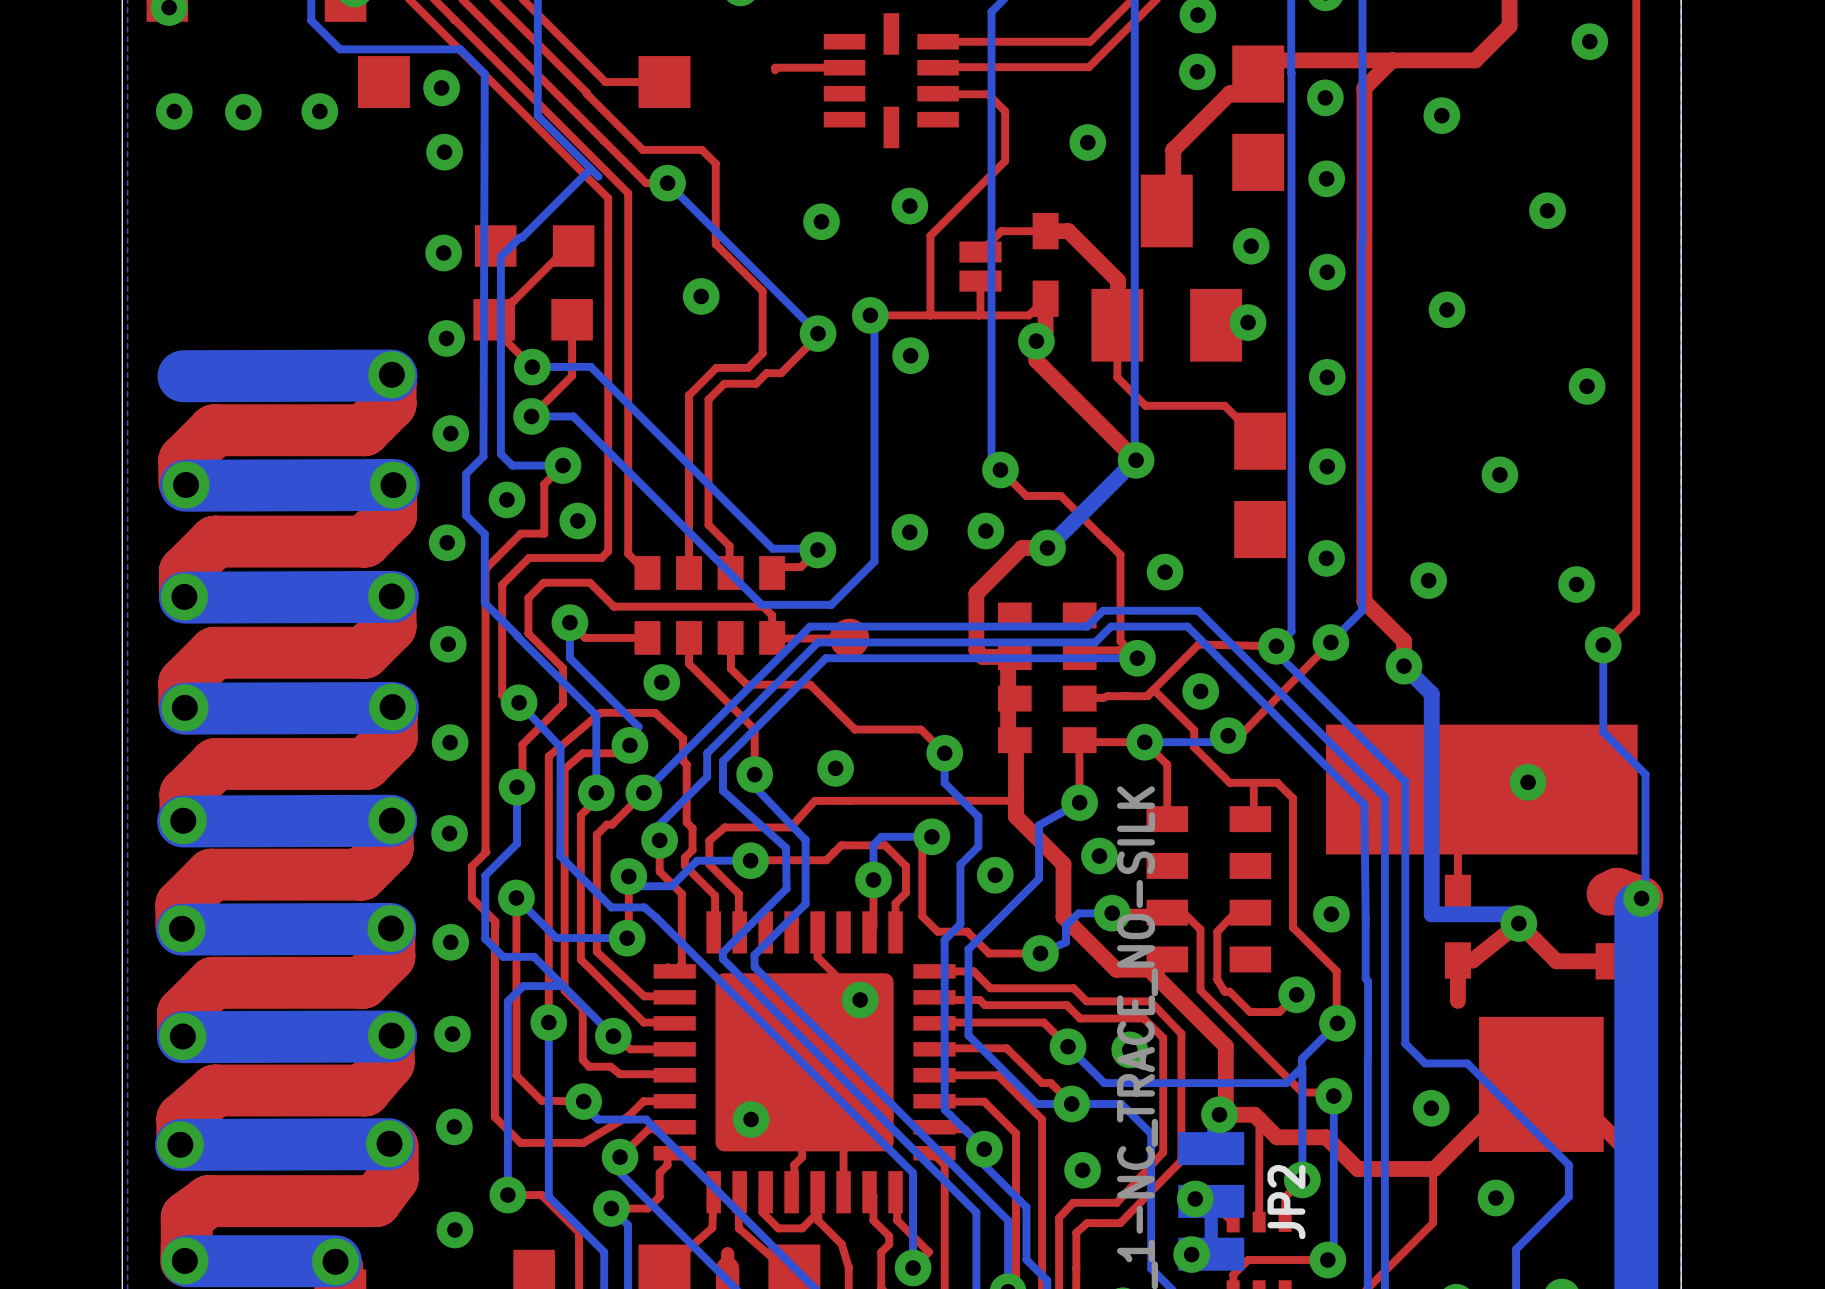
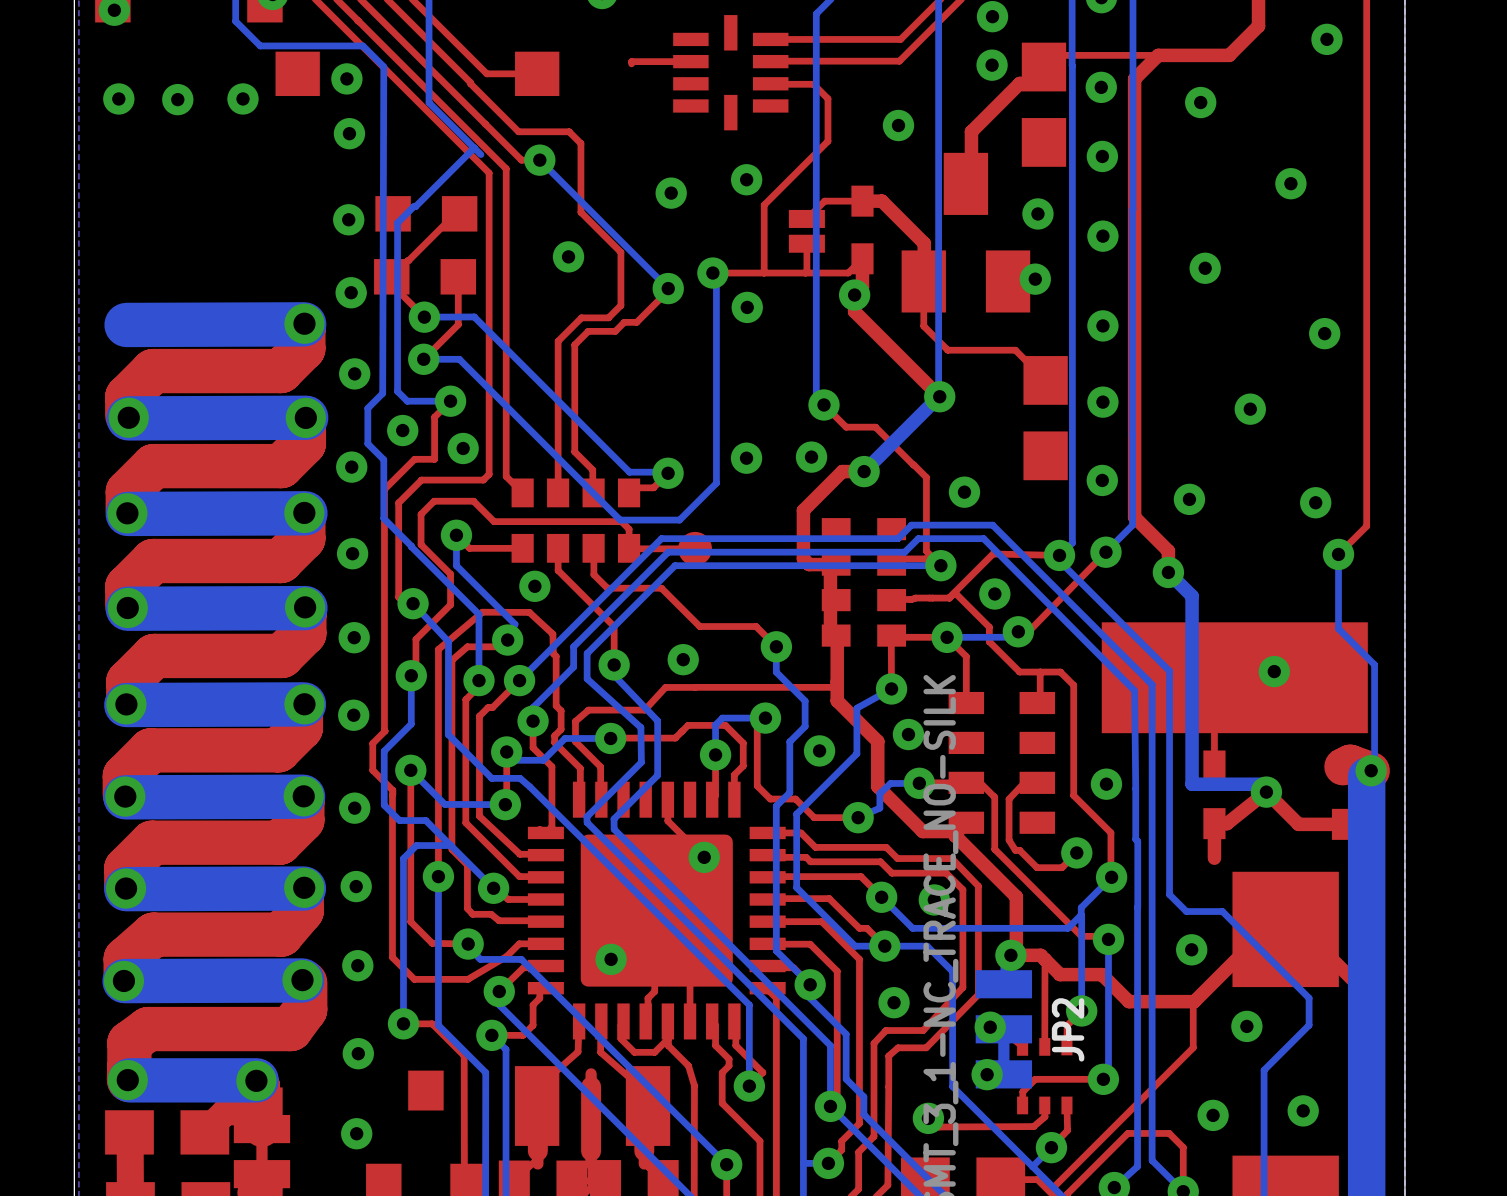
top track width: thick (1392, 60) (1271, 60) -> thin (1158, 55) (1055, 55)

